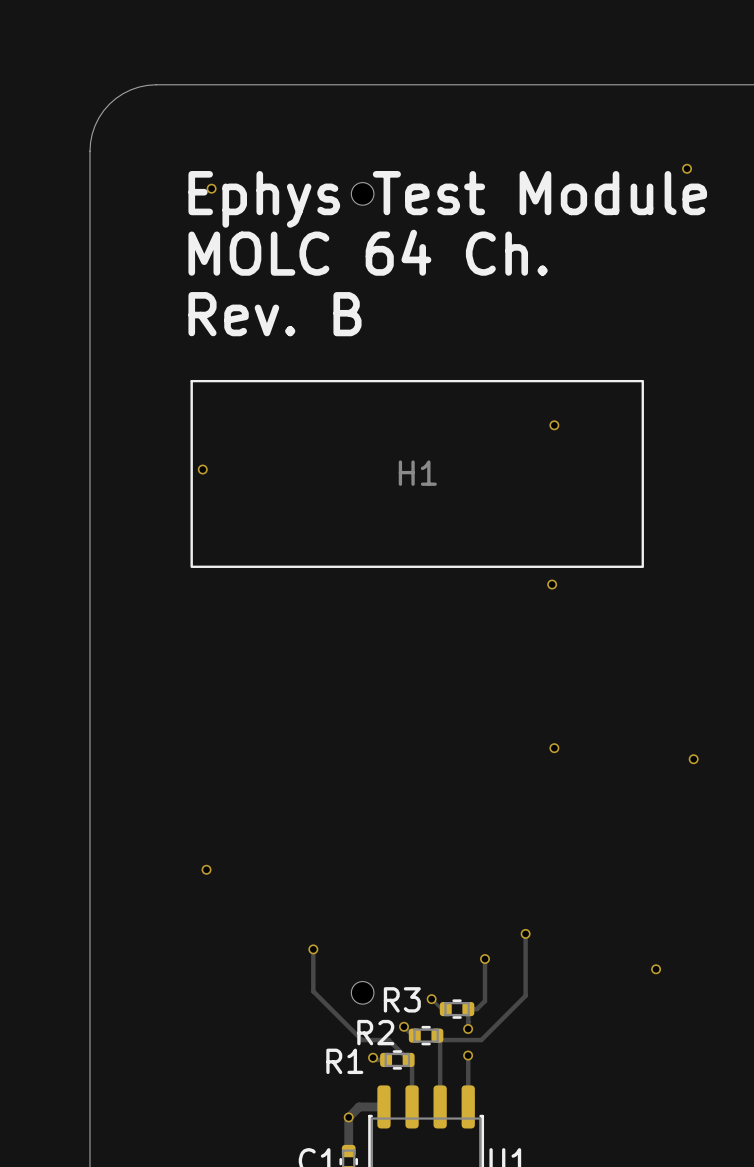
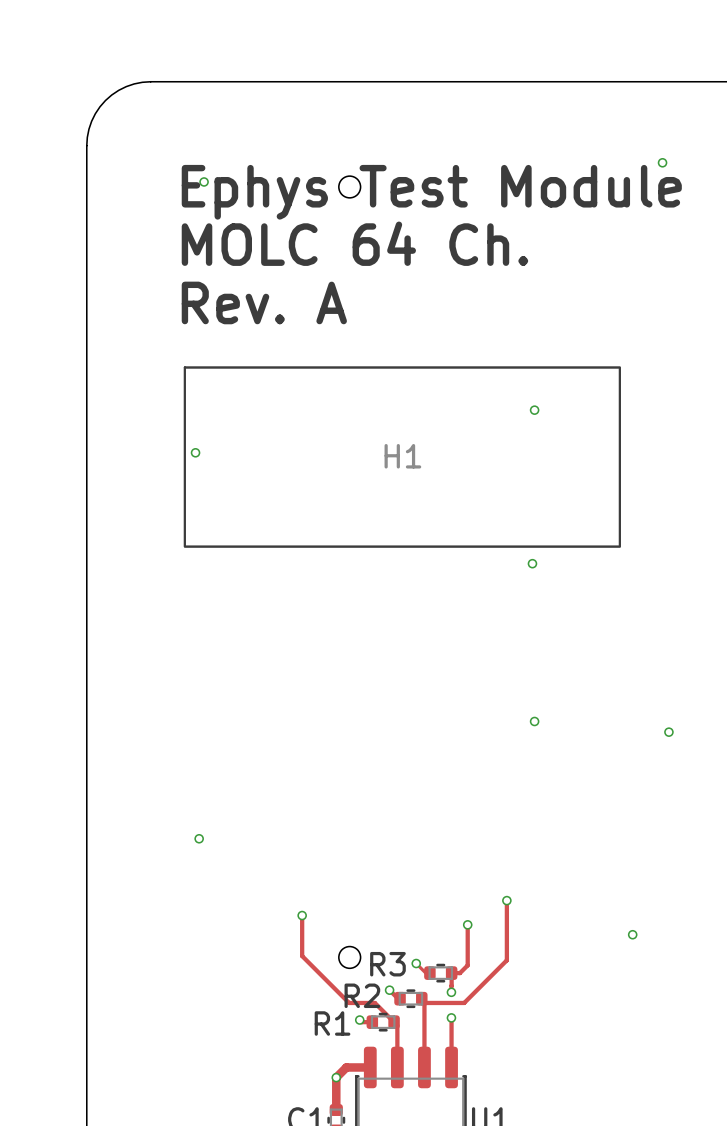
text: Rev. B (275, 314) -> Rev. A (264, 302)

